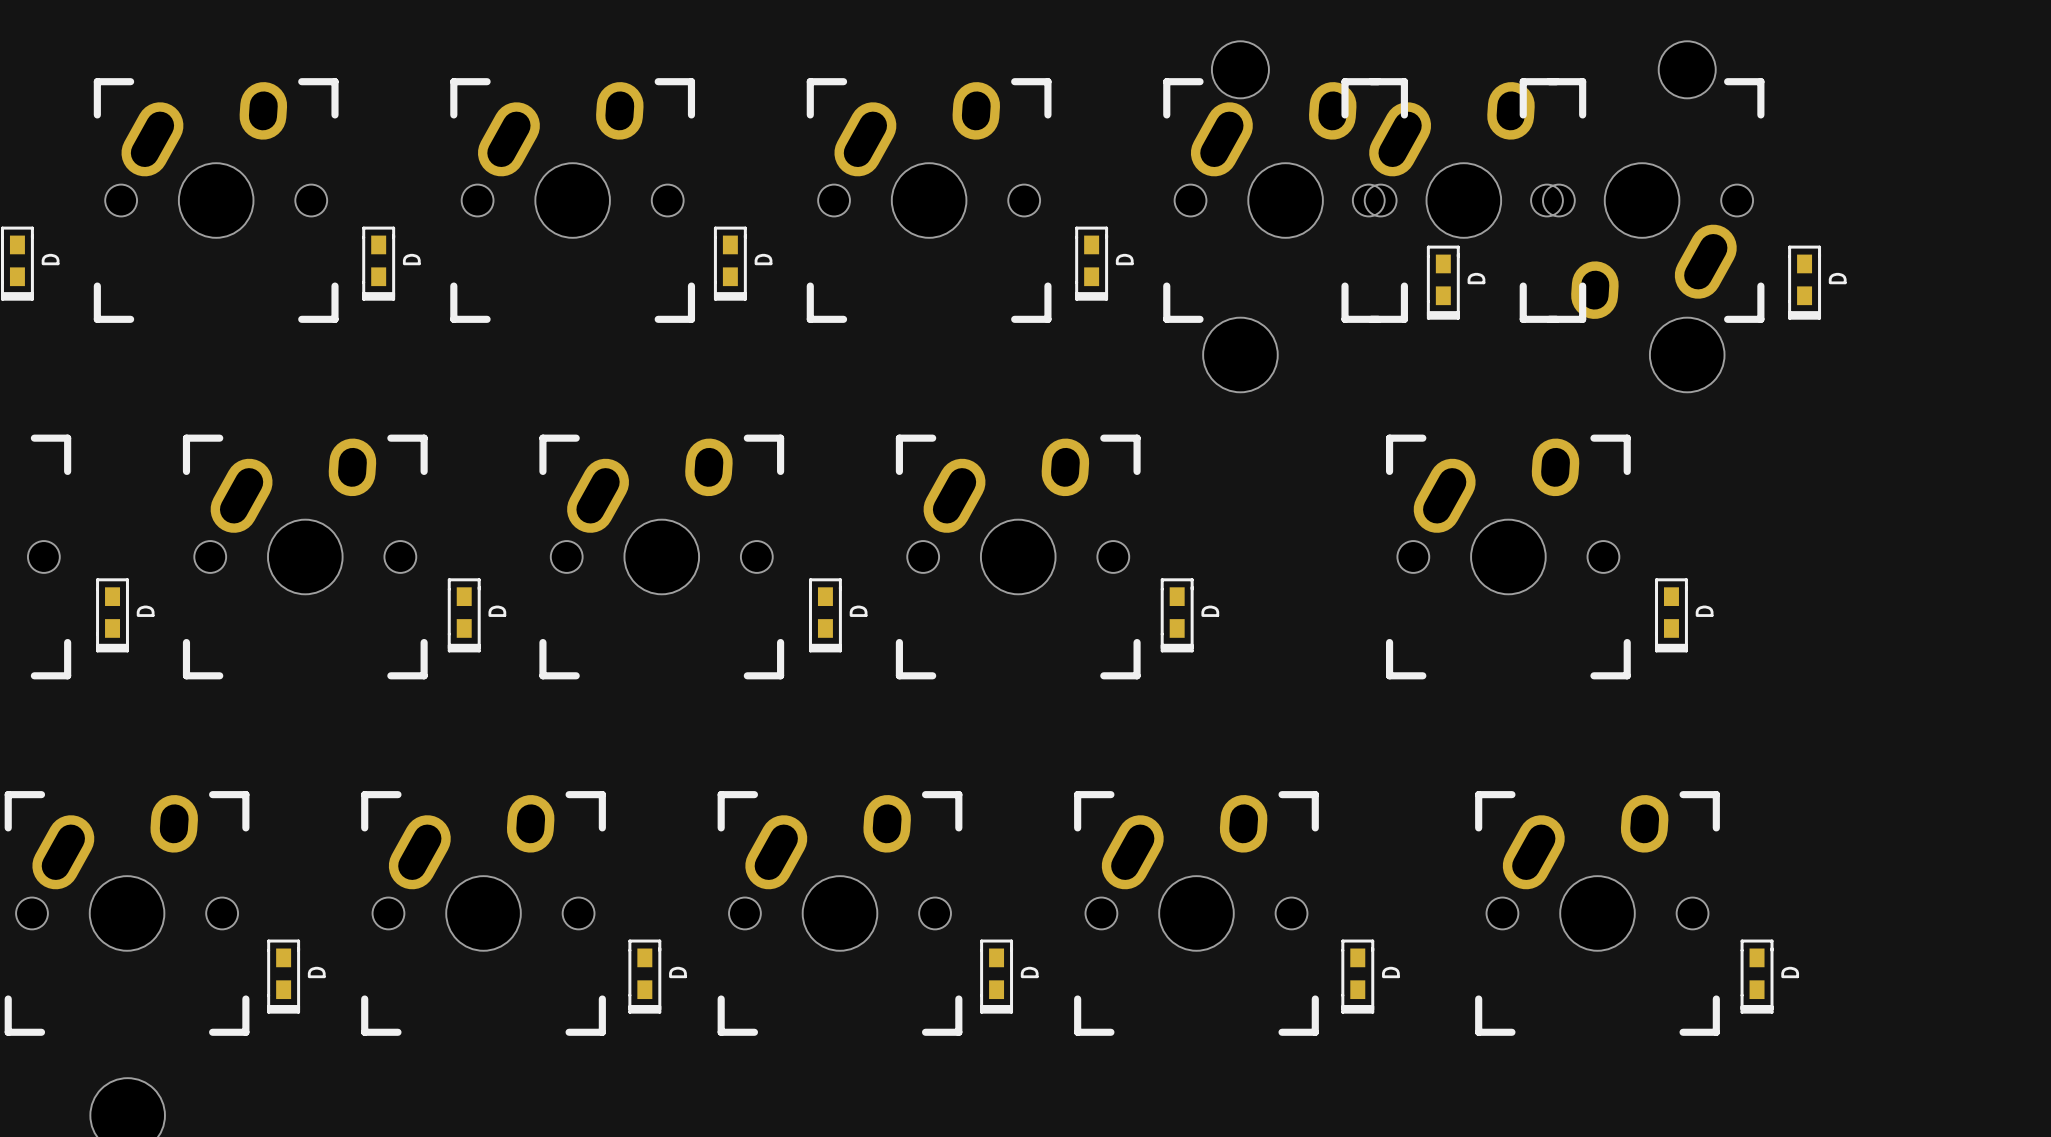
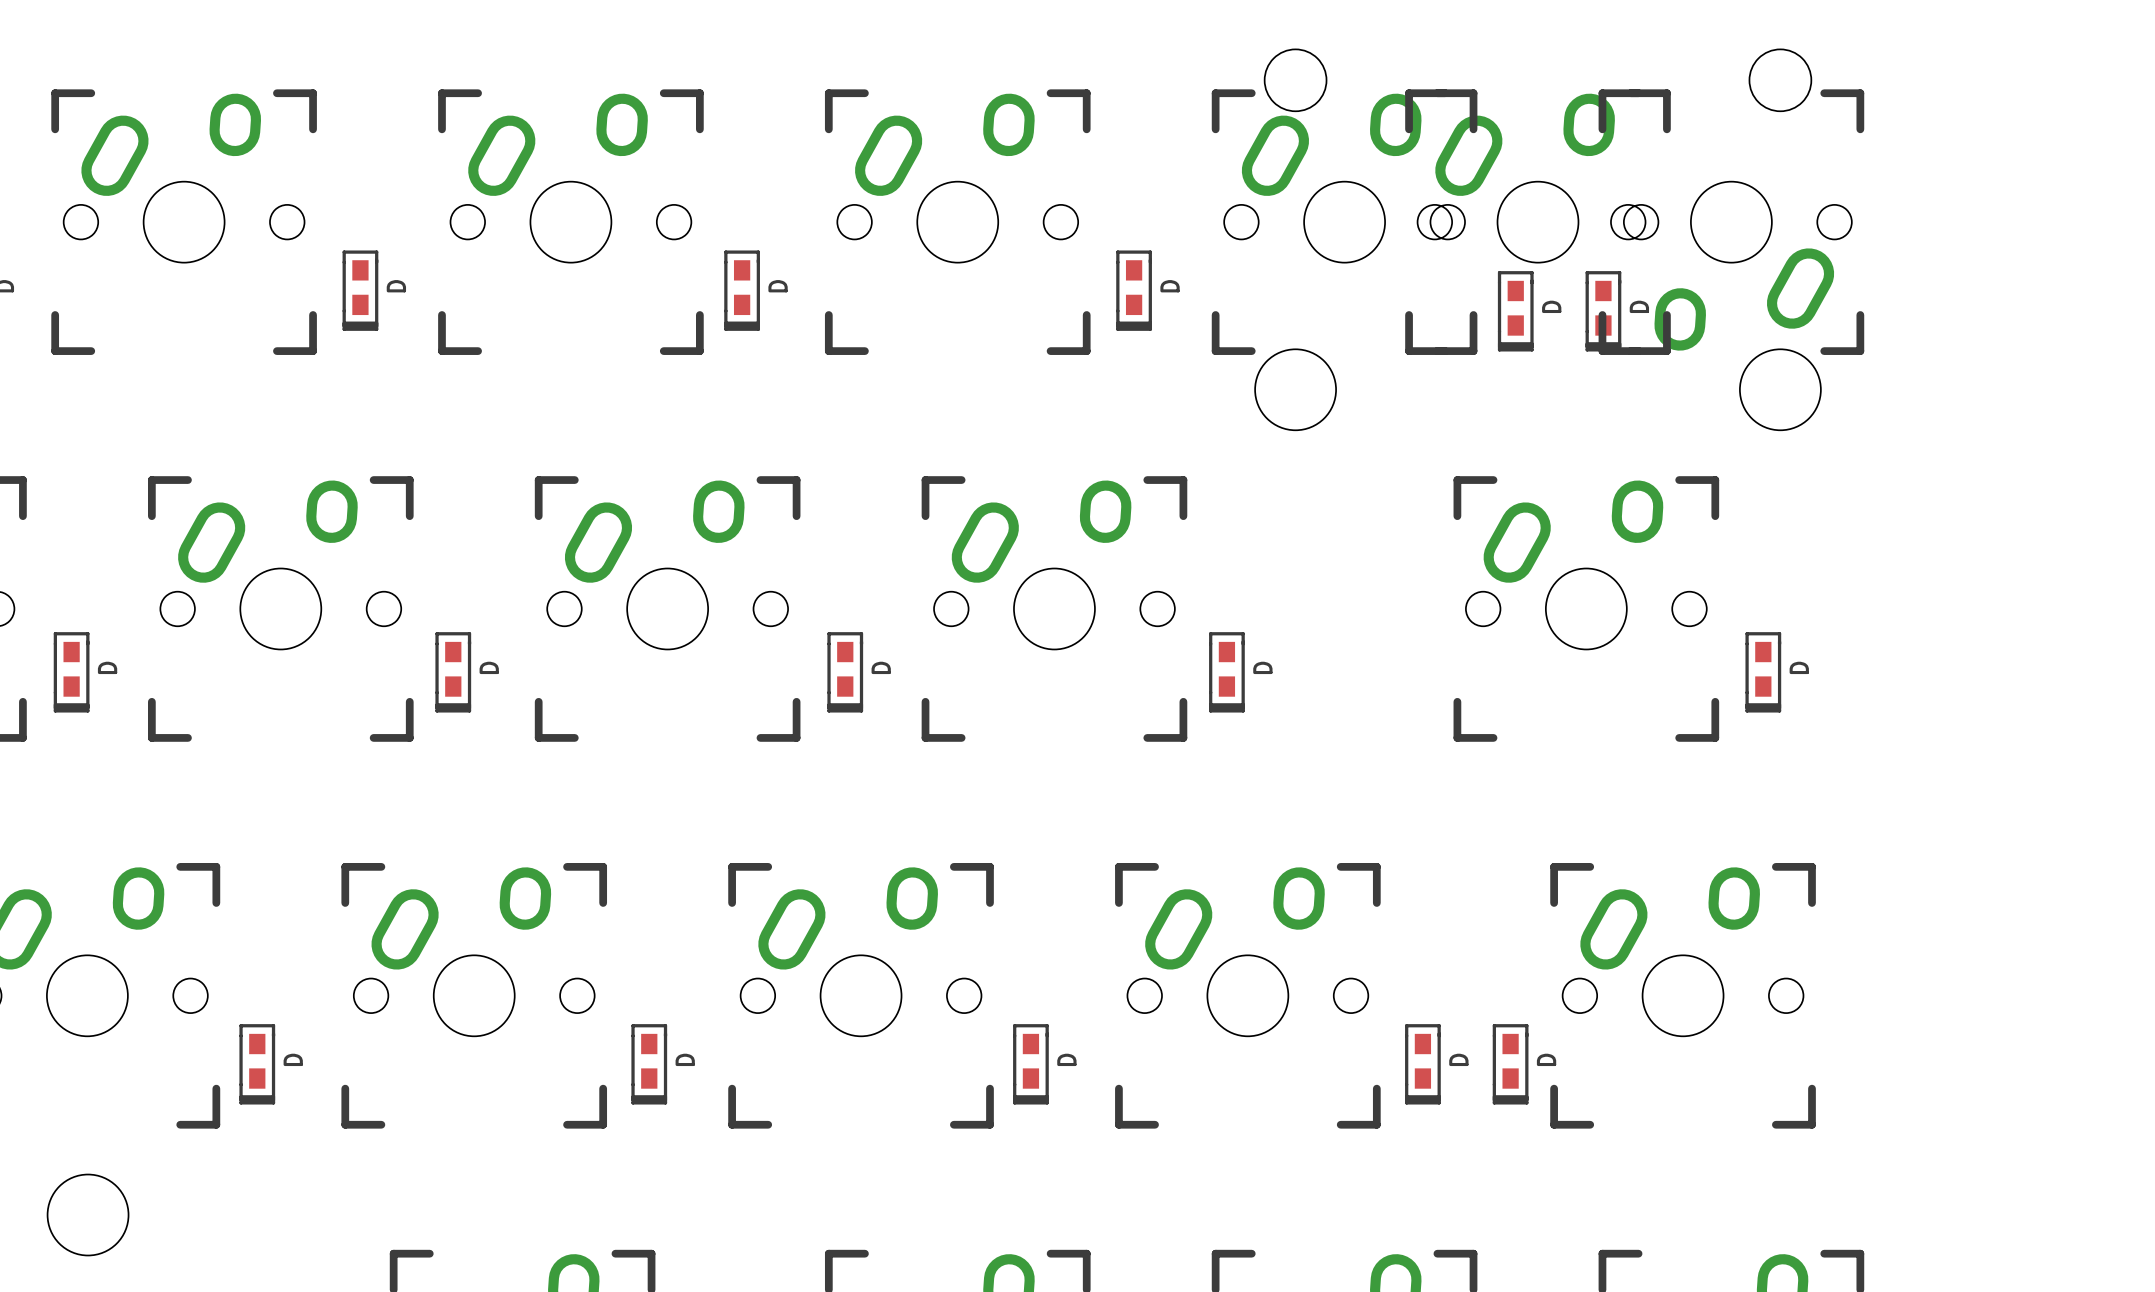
part position: (1804, 282) -> (1603, 311)
part position: (1757, 976) -> (1510, 1064)

